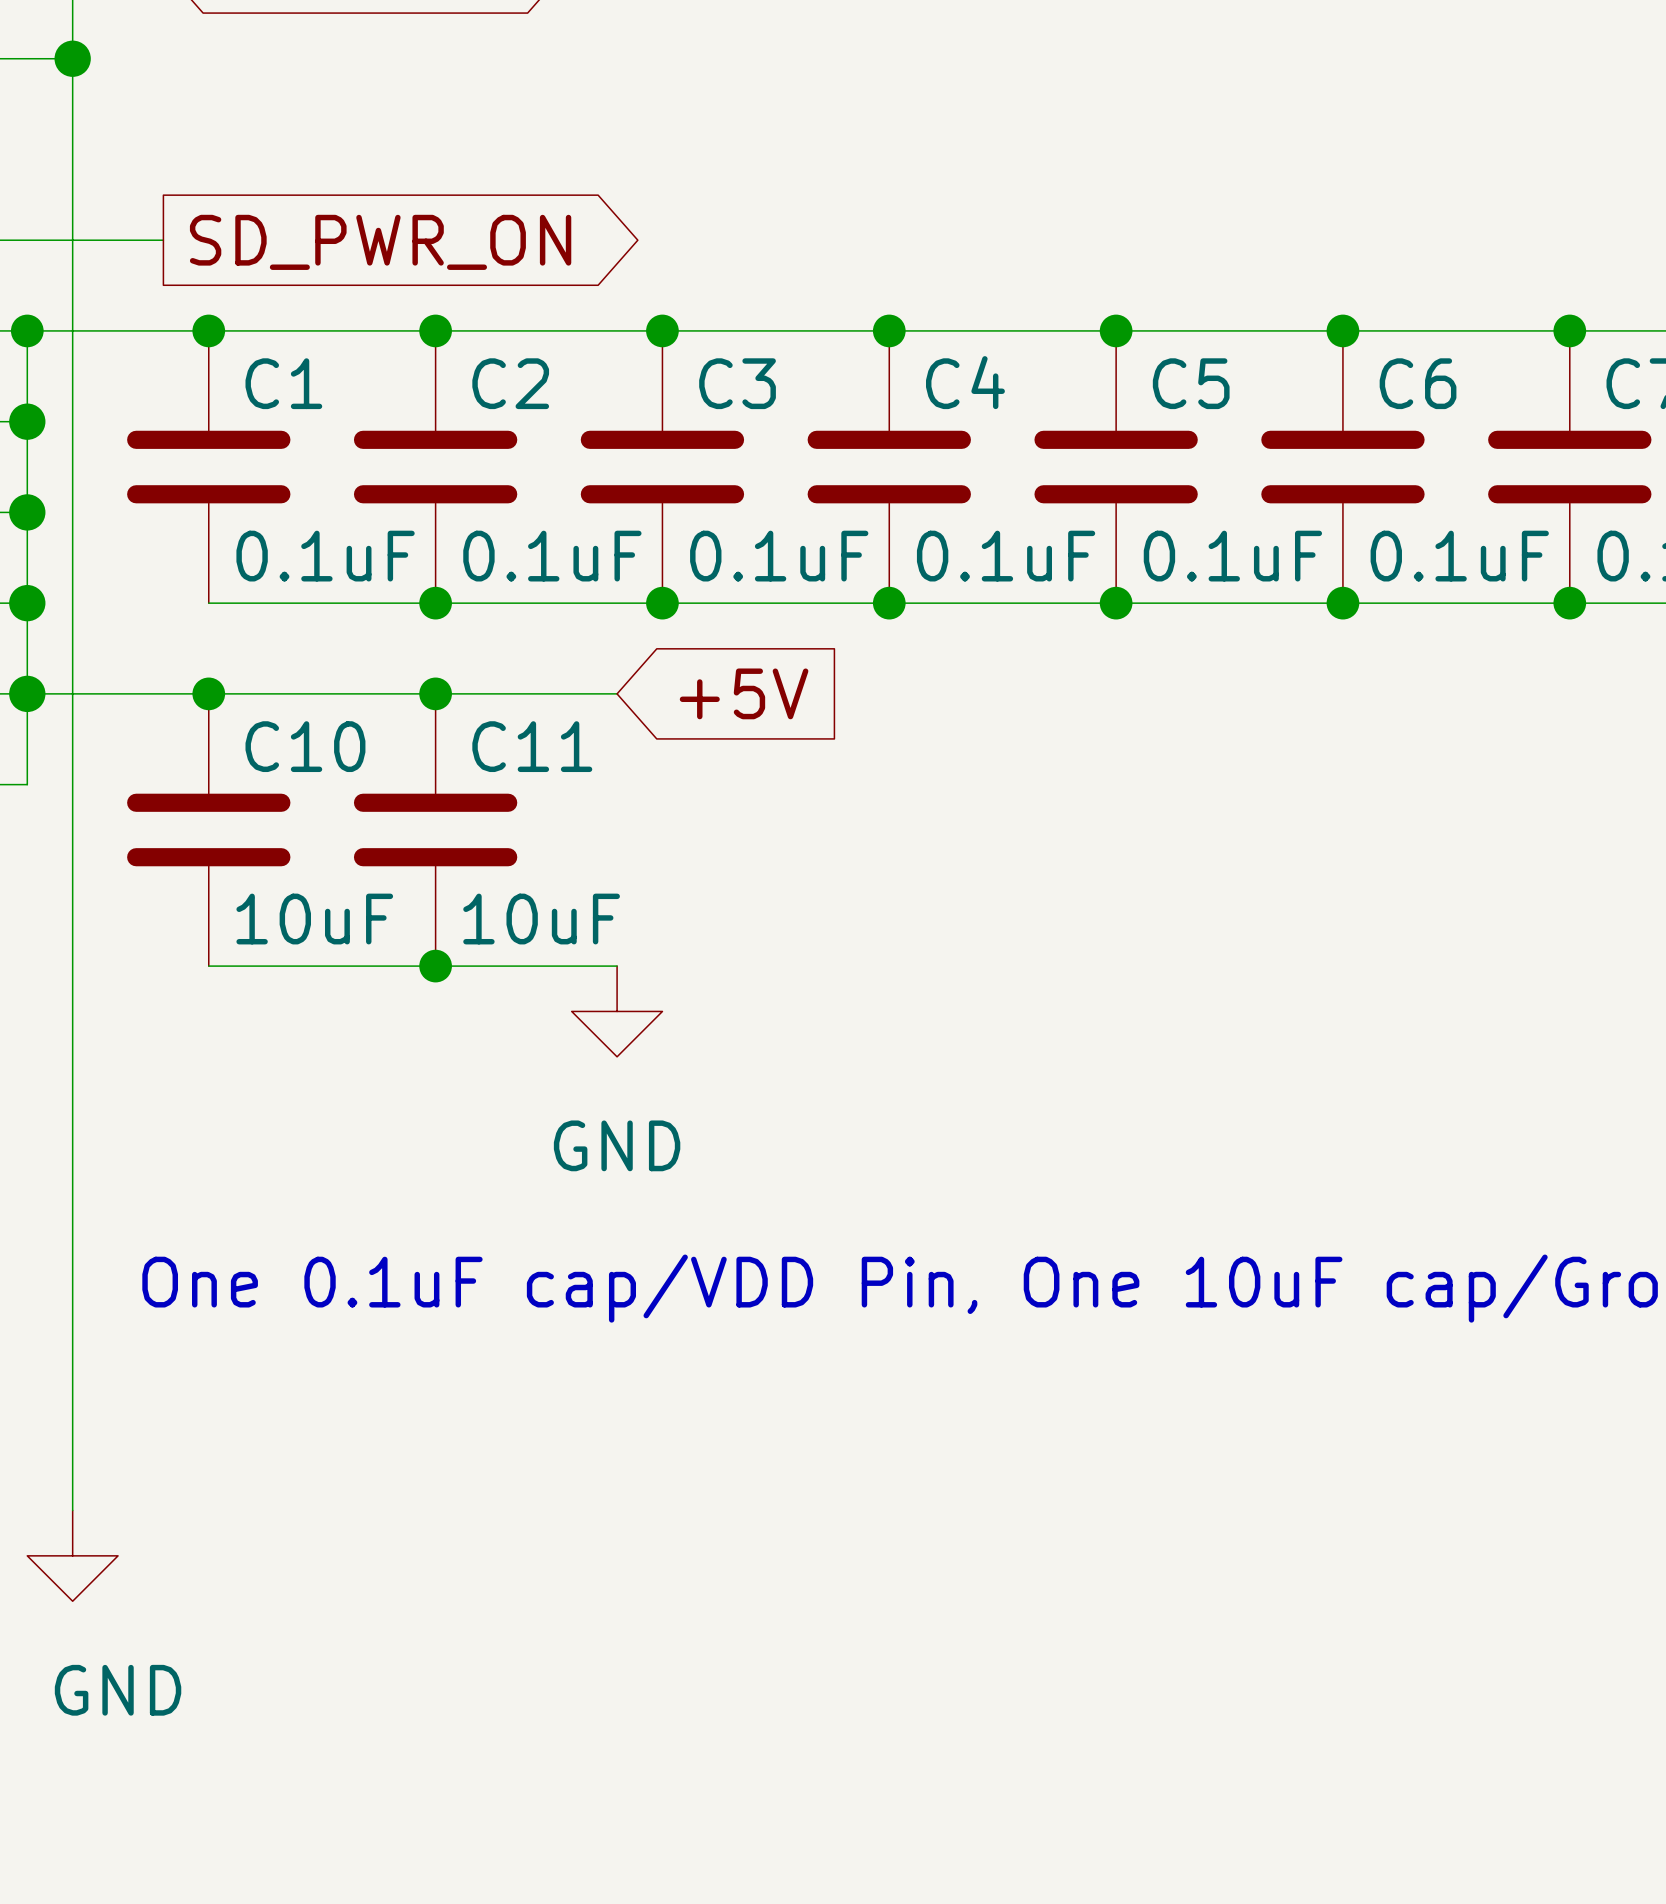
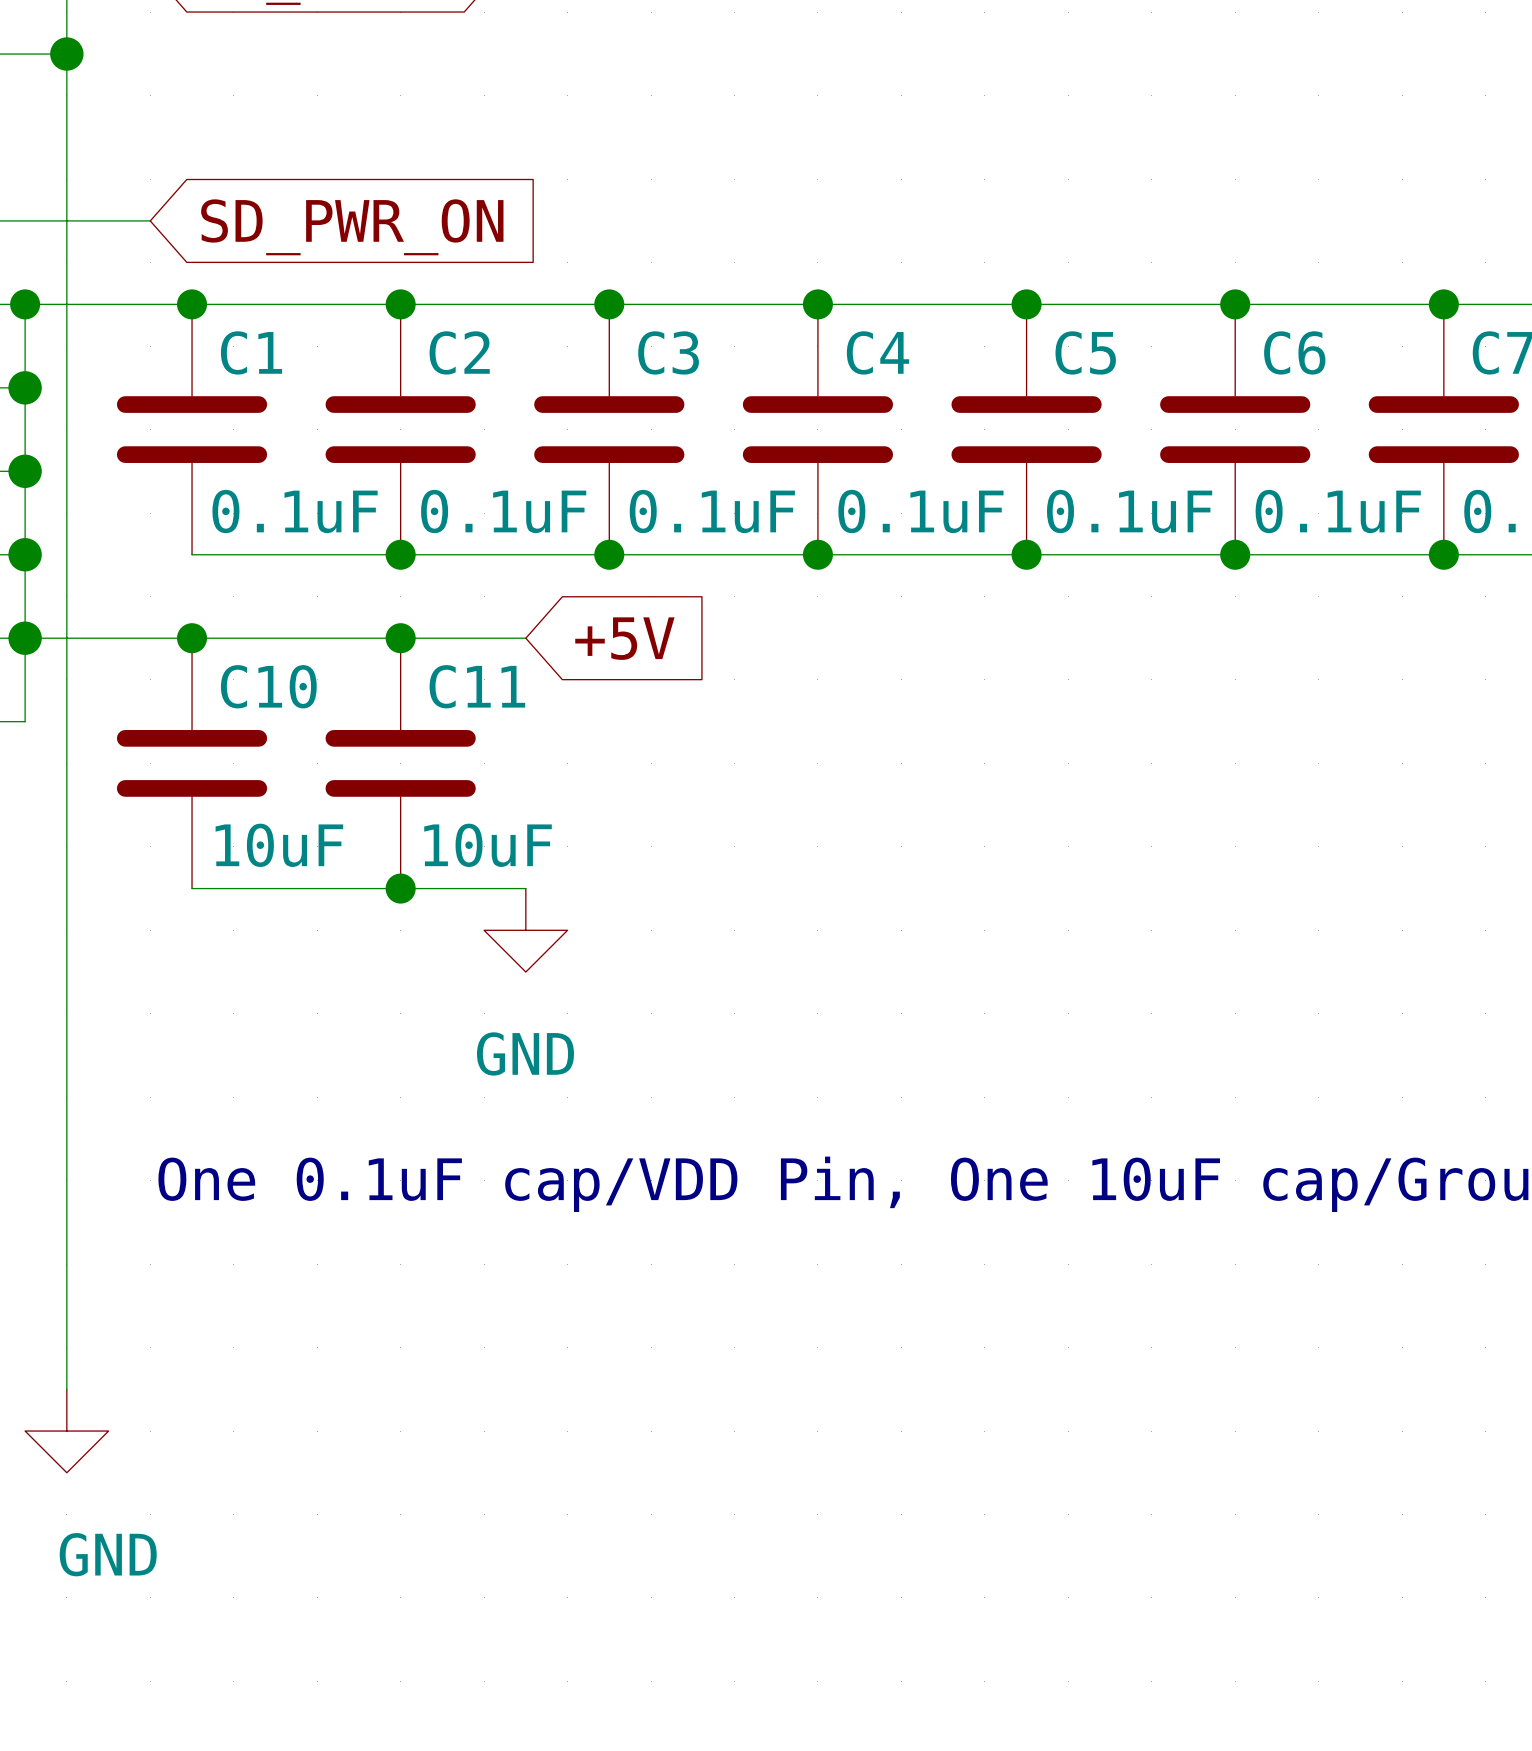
global label shape: output (380, 242) -> input (352, 227)
wire: (571, 693) (617, 693) -> none
global label position: +5V (744, 693) -> +5V (624, 638)
wire: (571, 966) (617, 966) -> none
power symbol position: GND (617, 1011) -> GND (525, 930)

